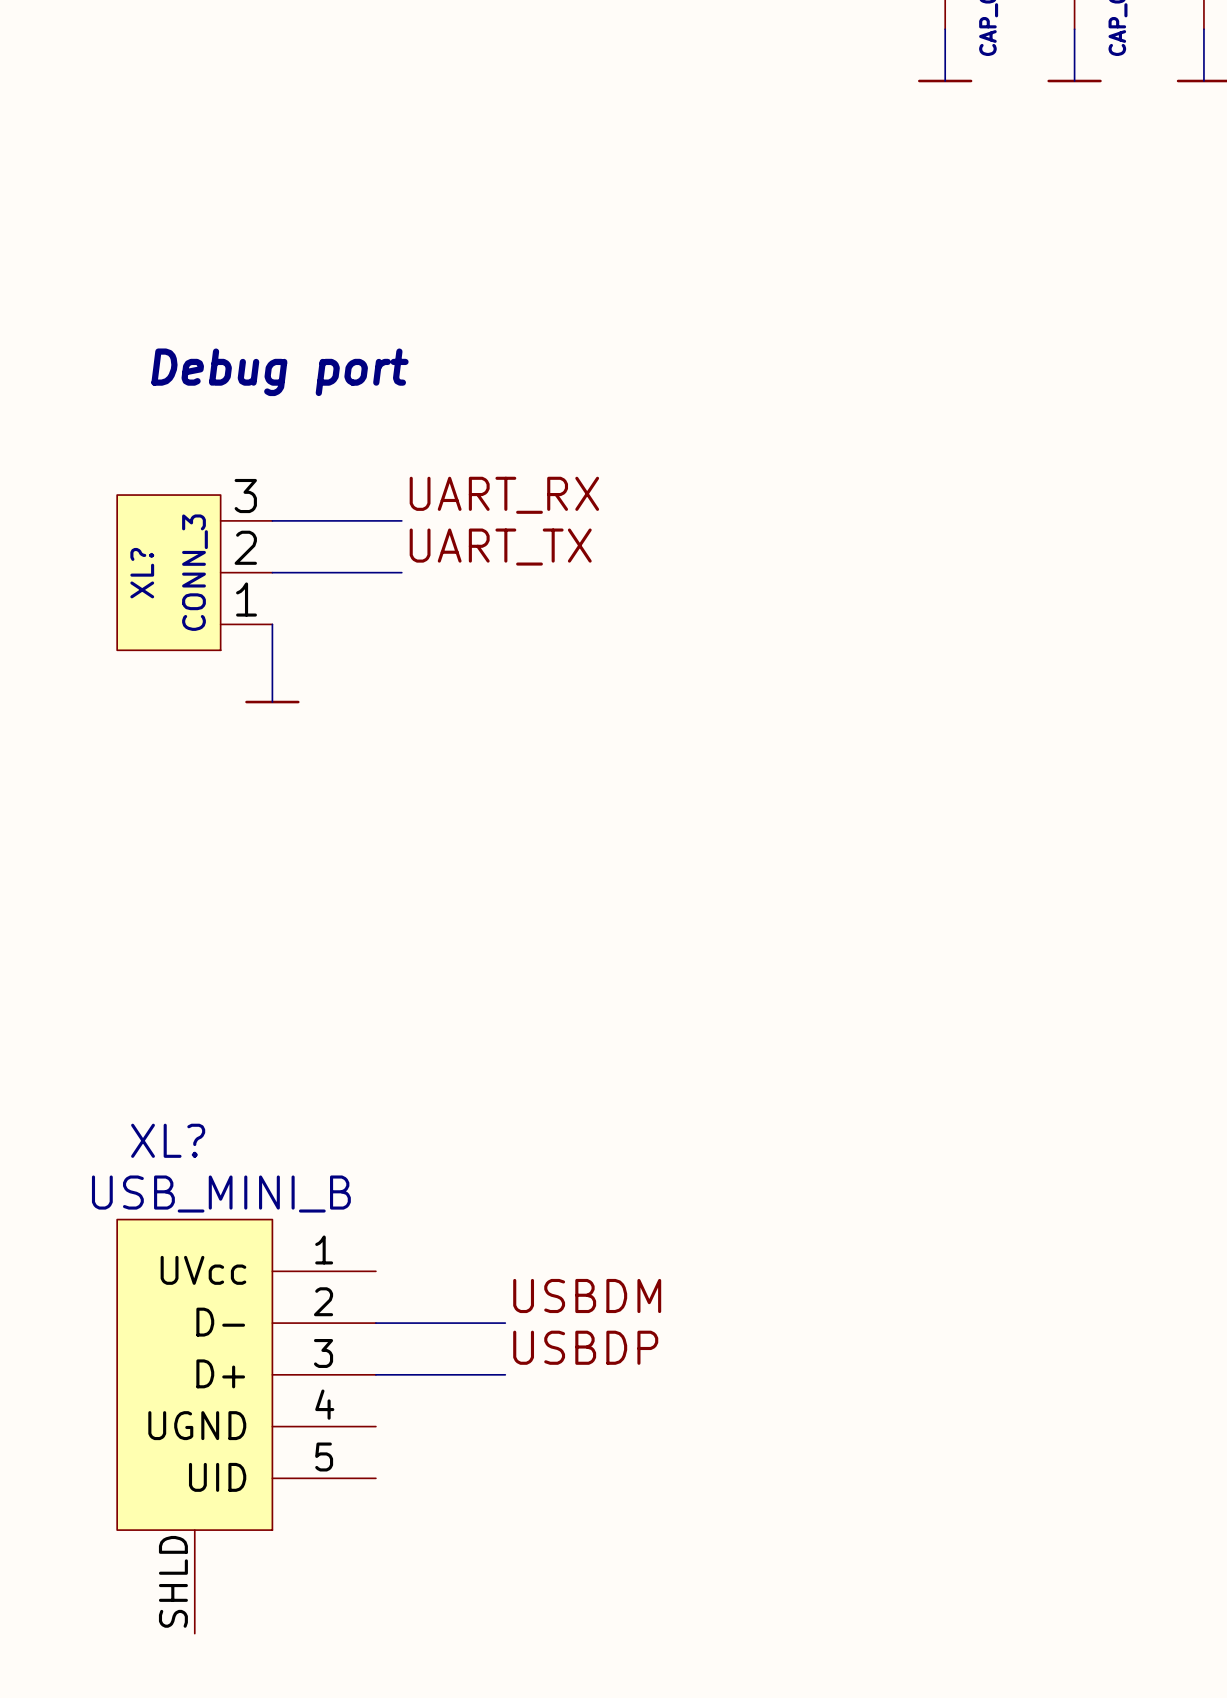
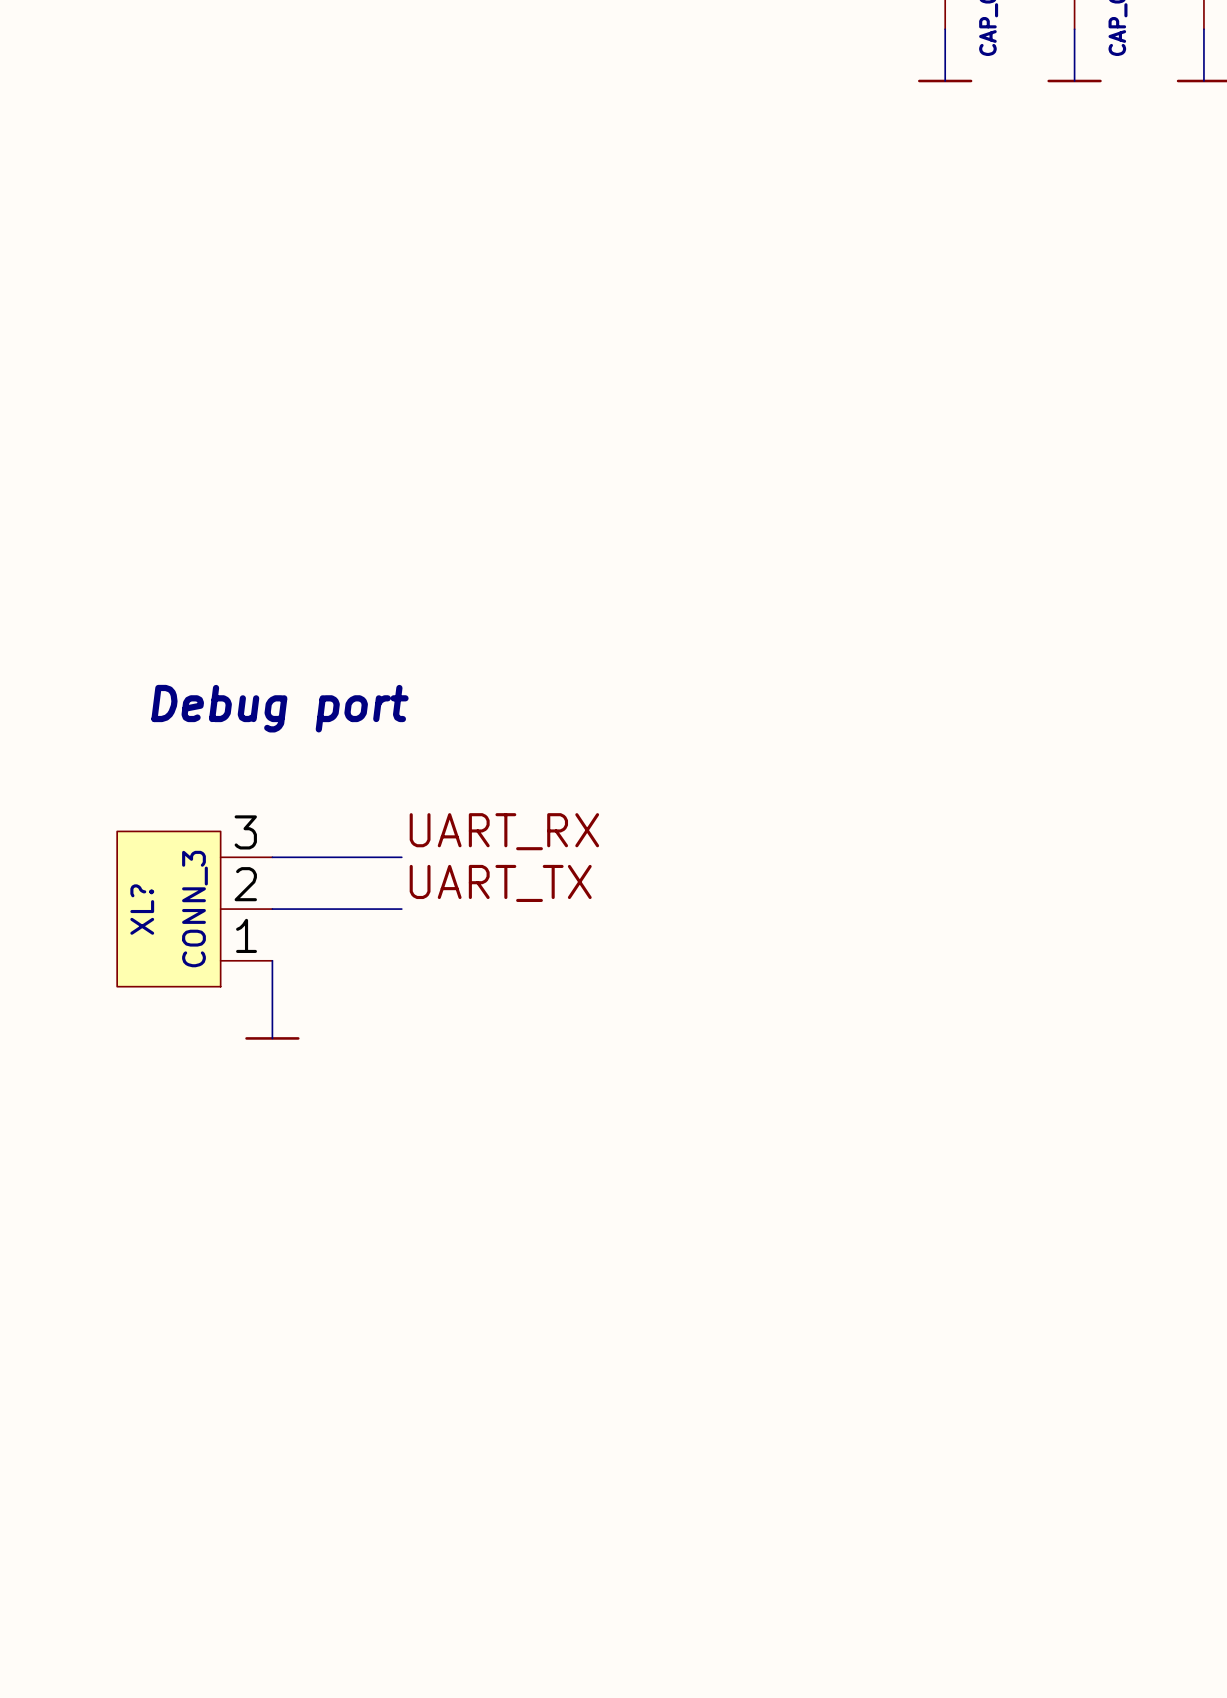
text position: Debug port (280, 372) -> Debug port (280, 708)
label position: UART_RX (504, 495) -> UART_RX (504, 831)
wire: (272, 520) (401, 520) -> (272, 857) (401, 857)
label position: UART_TX (500, 547) -> UART_TX (500, 883)
XL? position: (194, 572) -> (194, 909)
wire: (272, 572) (401, 572) -> (272, 909) (401, 909)
wire: (272, 624) (272, 702) -> (272, 960) (272, 1038)
power symbol position: (272, 702) -> (272, 1038)
label: USBDM (587, 1295) -> none
wire: (375, 1323) (505, 1323) -> none
label: USBDP (585, 1347) -> none
wire: (375, 1374) (505, 1374) -> none
XL?: USB_MINI_B (246, 1426) -> none

